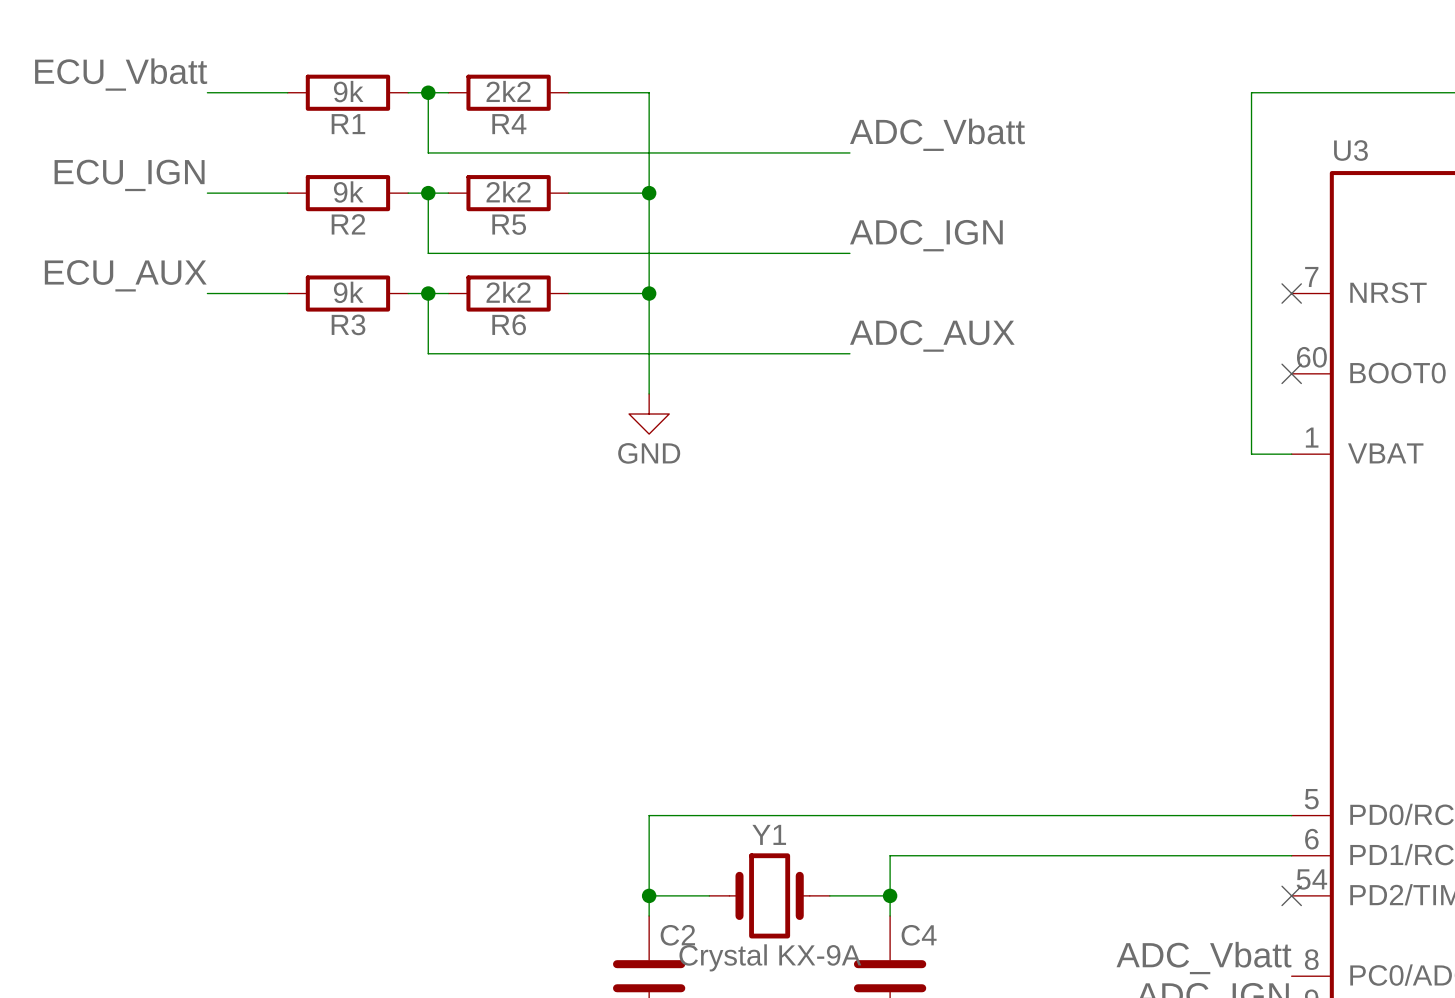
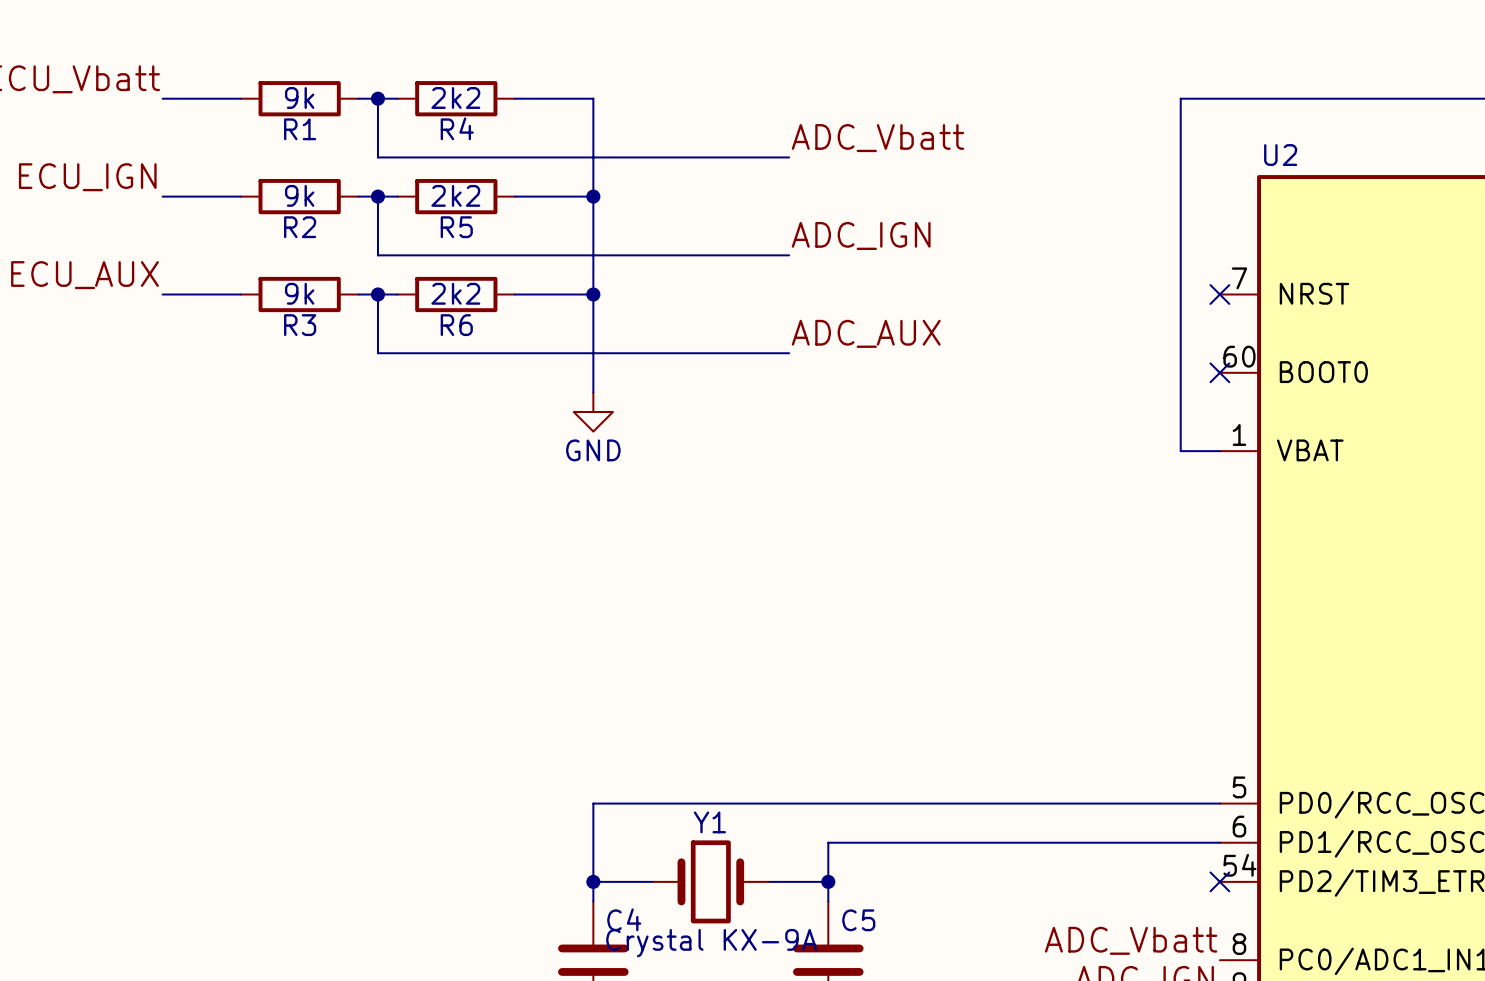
U3 name: U3 (1350, 150) -> U2 (1280, 155)
C2 name: C2 (677, 935) -> C4 (624, 919)
C4 name: C4 (919, 935) -> C5 (858, 920)

